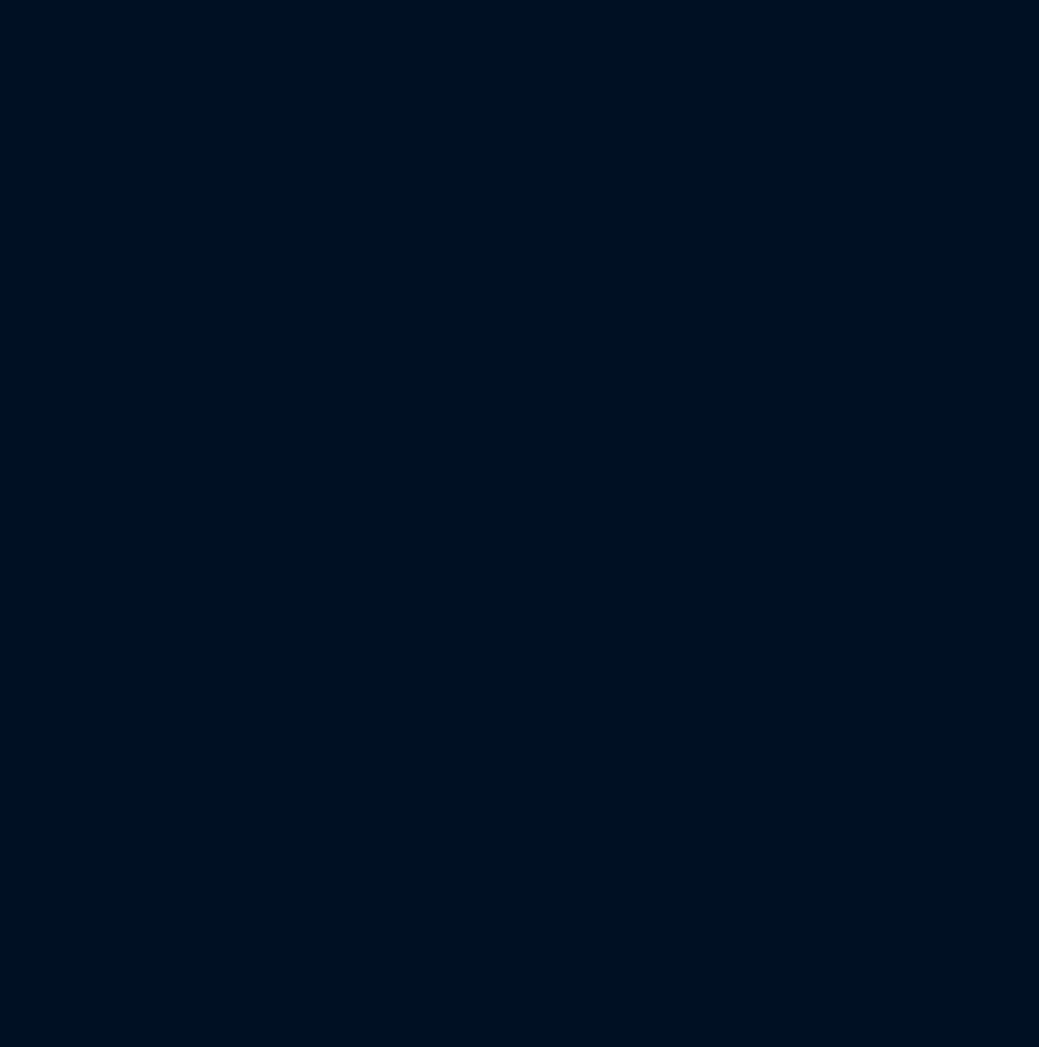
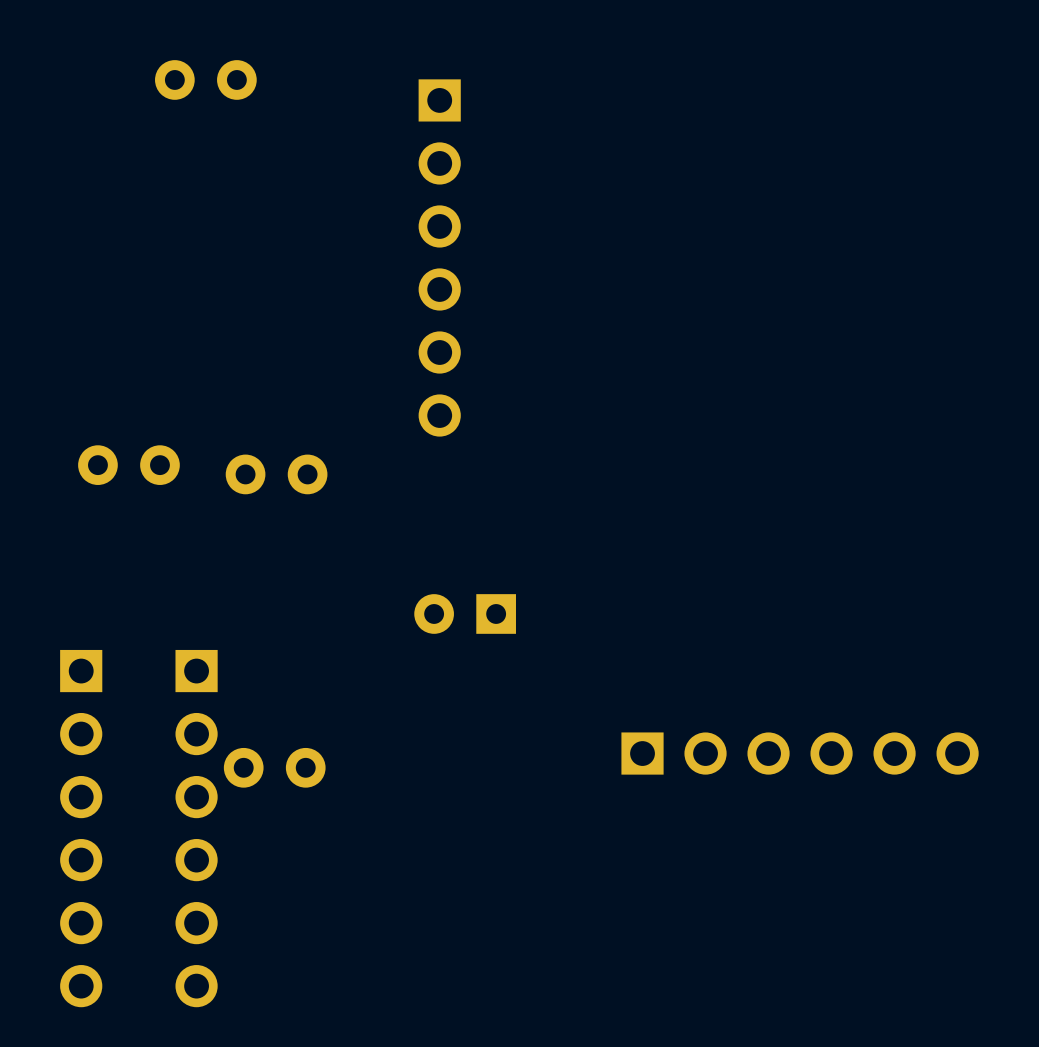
part: none -> (205, 79)
part: none -> (439, 257)
part: none -> (128, 465)
part: none -> (276, 474)
part: none -> (465, 613)
part: none -> (800, 753)
part: none -> (274, 767)
part: none -> (81, 828)
part: none -> (196, 828)

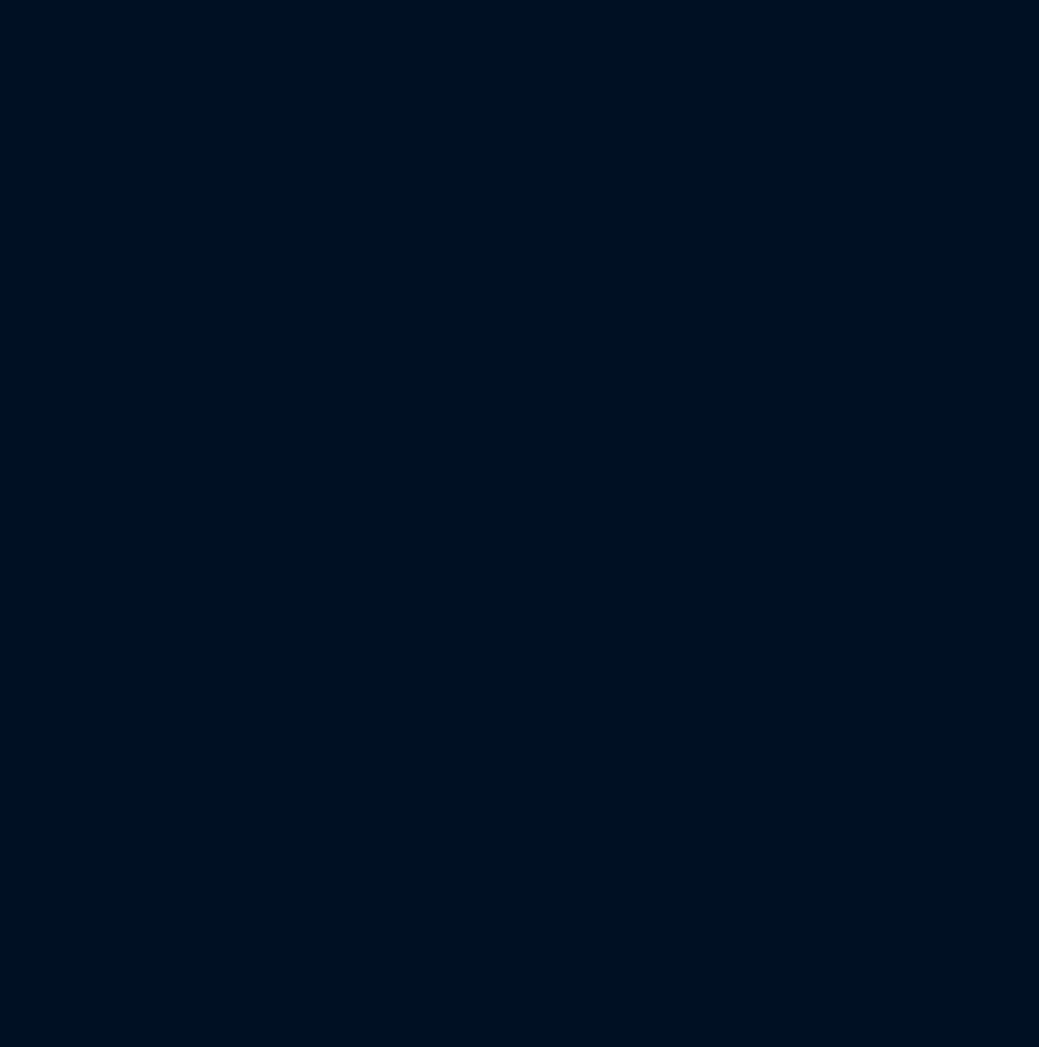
part: (205, 79) -> none
part: (439, 257) -> none
part: (128, 465) -> none
part: (276, 474) -> none
part: (465, 613) -> none
part: (800, 753) -> none
part: (274, 767) -> none
part: (81, 828) -> none
part: (196, 828) -> none

